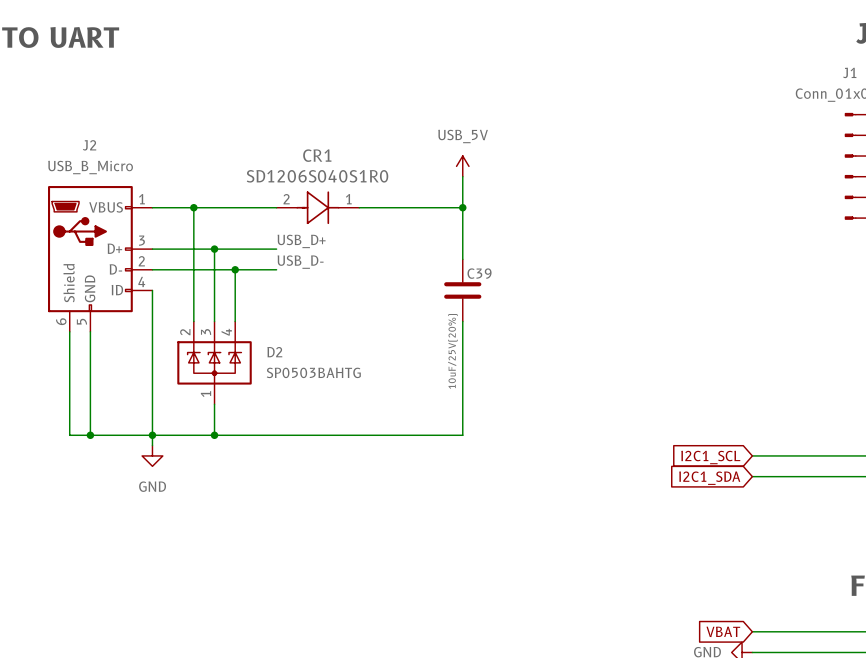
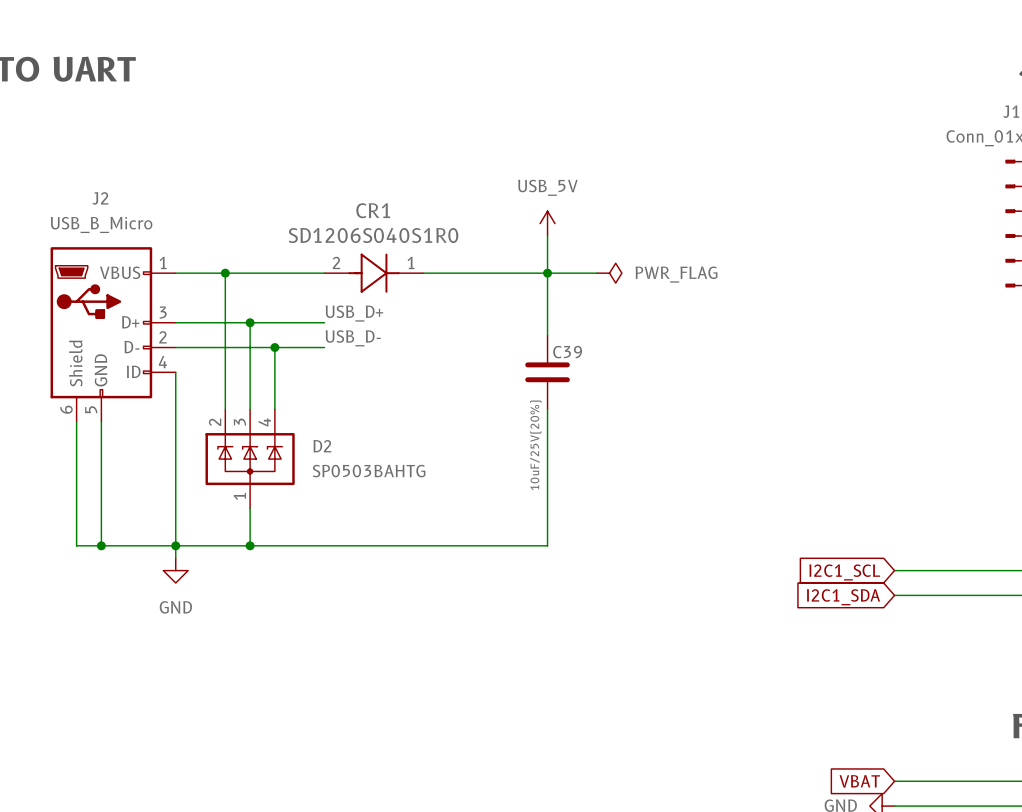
wire: none -> (547, 273) (597, 273)
power symbol: none -> PWR_FLAG (609, 273)

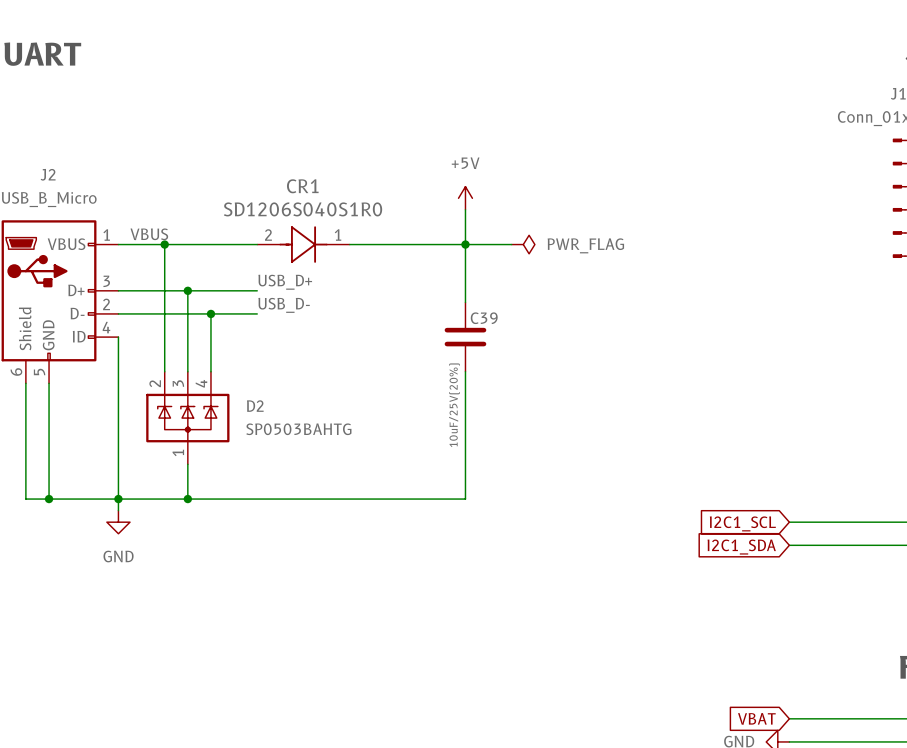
power symbol: USB_5V (547, 223) -> +5V (465, 198)
label: none -> VBUS (149, 234)

